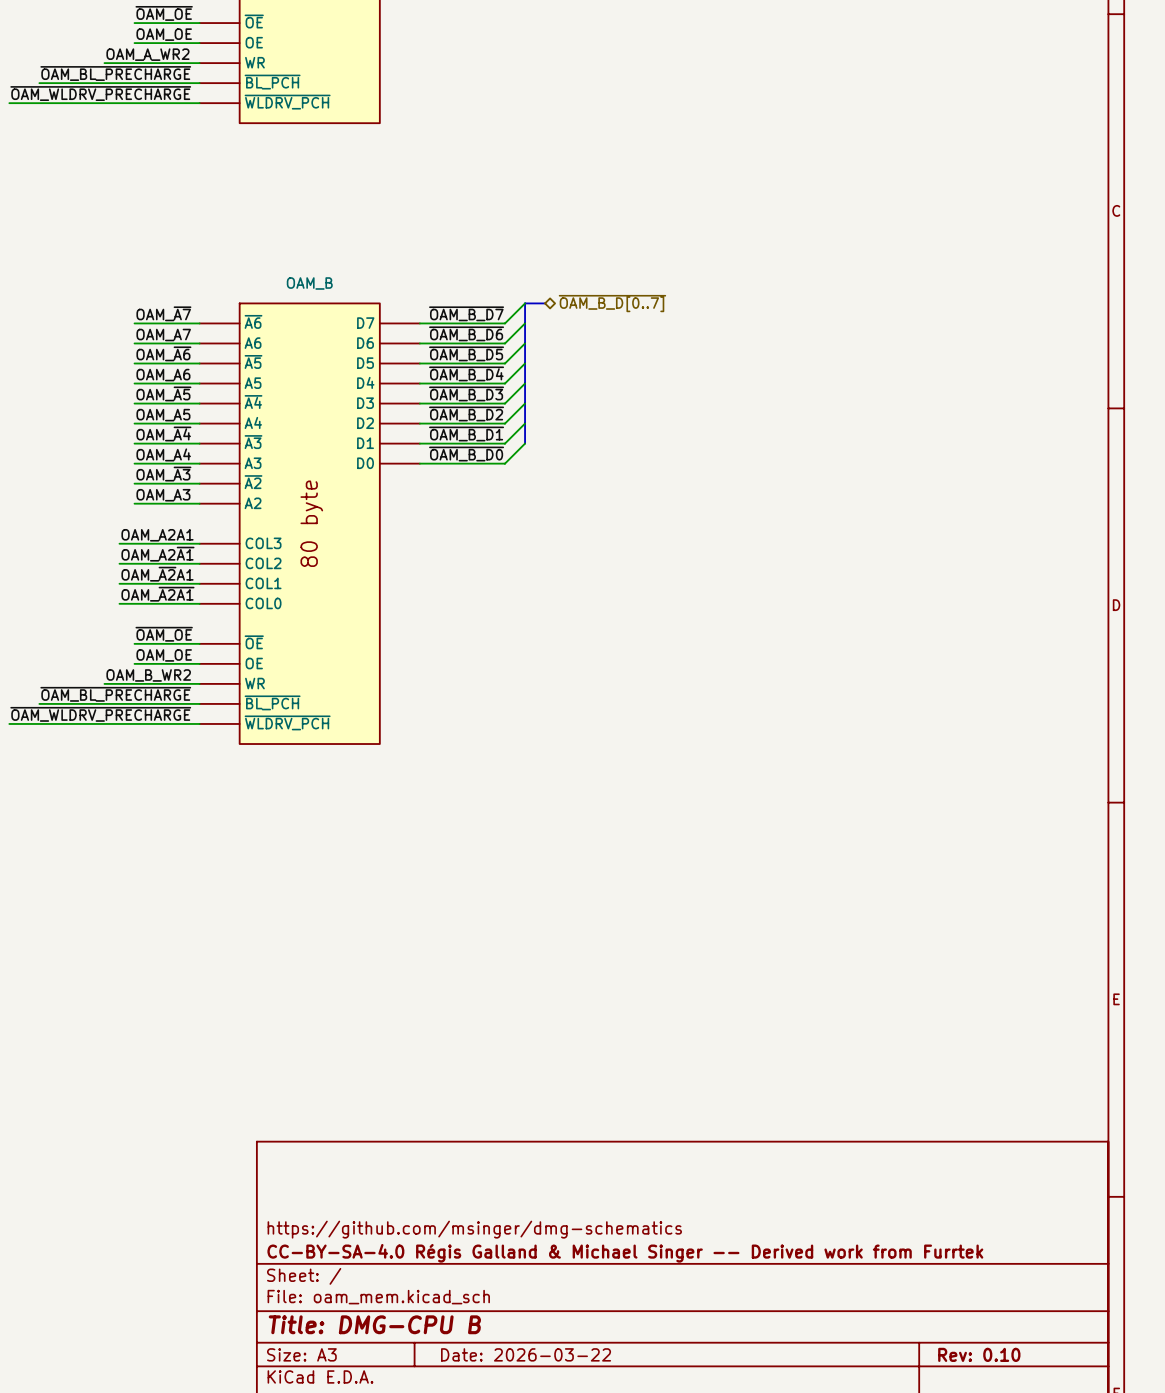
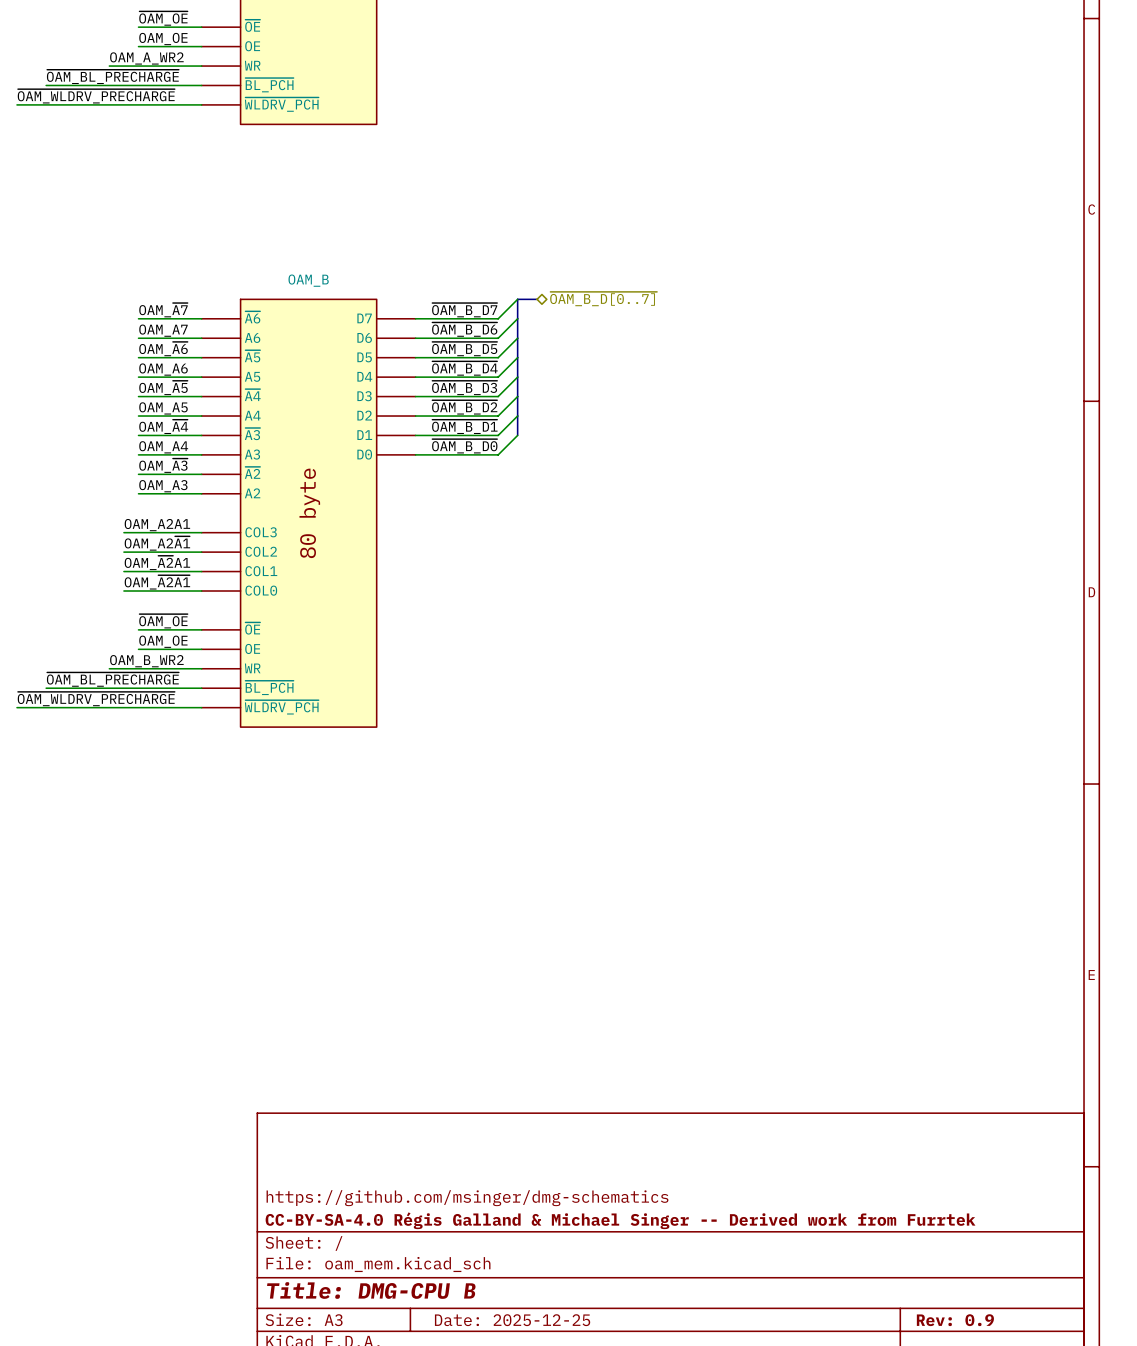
title block: Date: 2026-03-22 (526, 1354) -> Date: 2025-12-25 (512, 1320)
title block: Rev: 0.10 (979, 1354) -> Rev: 0.9 (955, 1320)

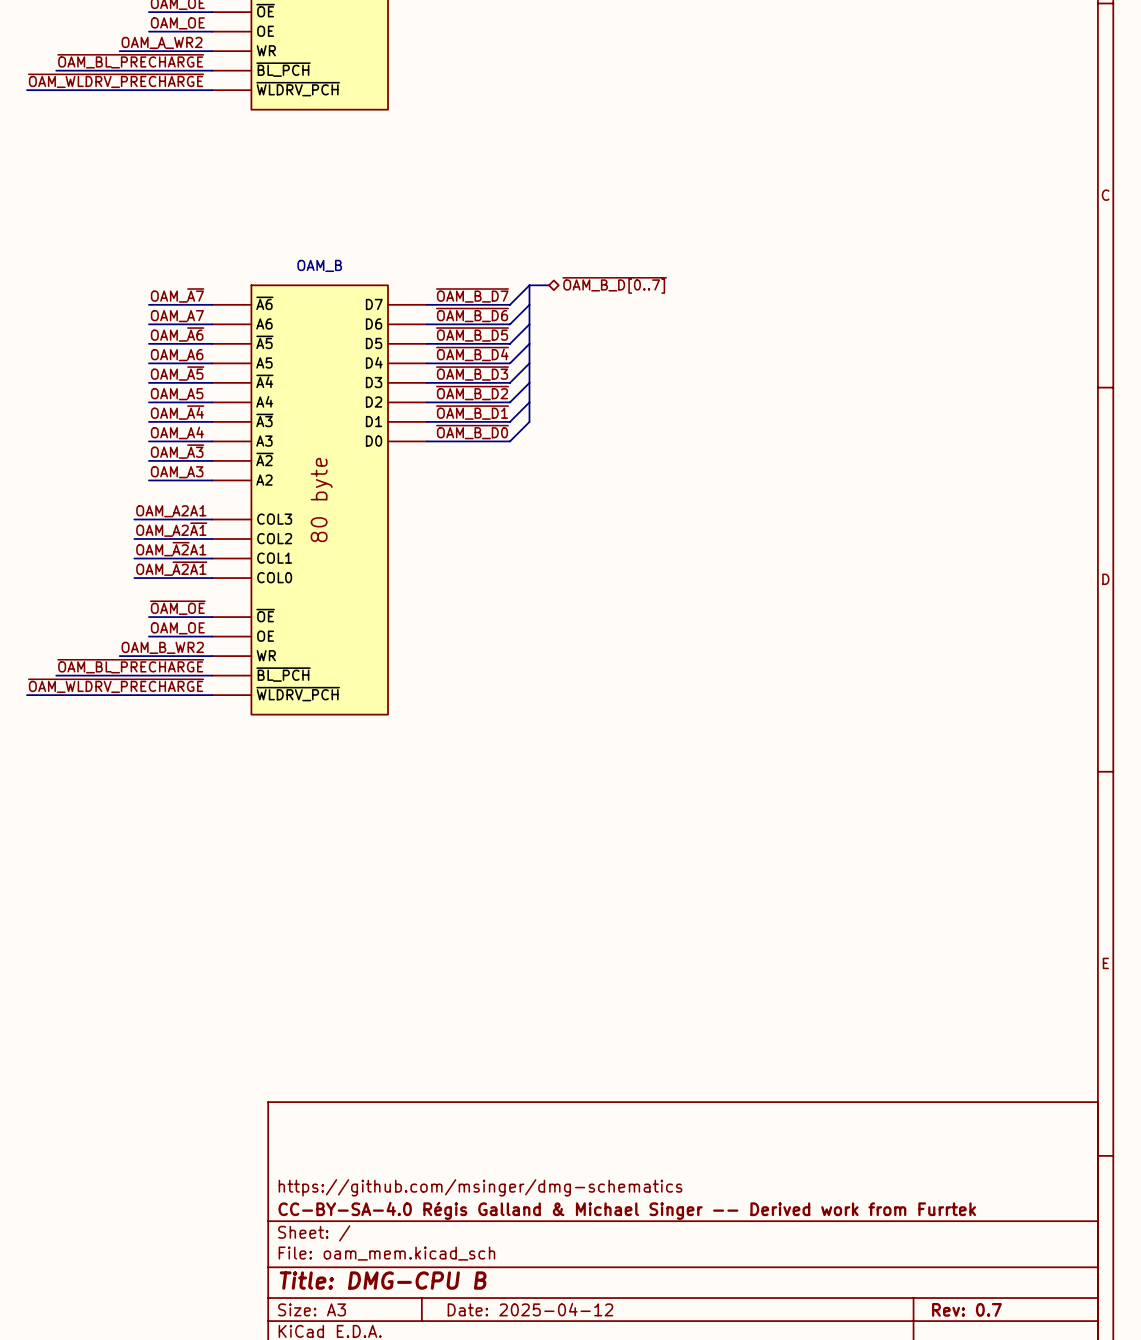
title block: Date: 2025-12-25 (512, 1320) -> Date: 2025-04-12 (530, 1309)
title block: Rev: 0.9 (955, 1320) -> Rev: 0.7 (966, 1309)

